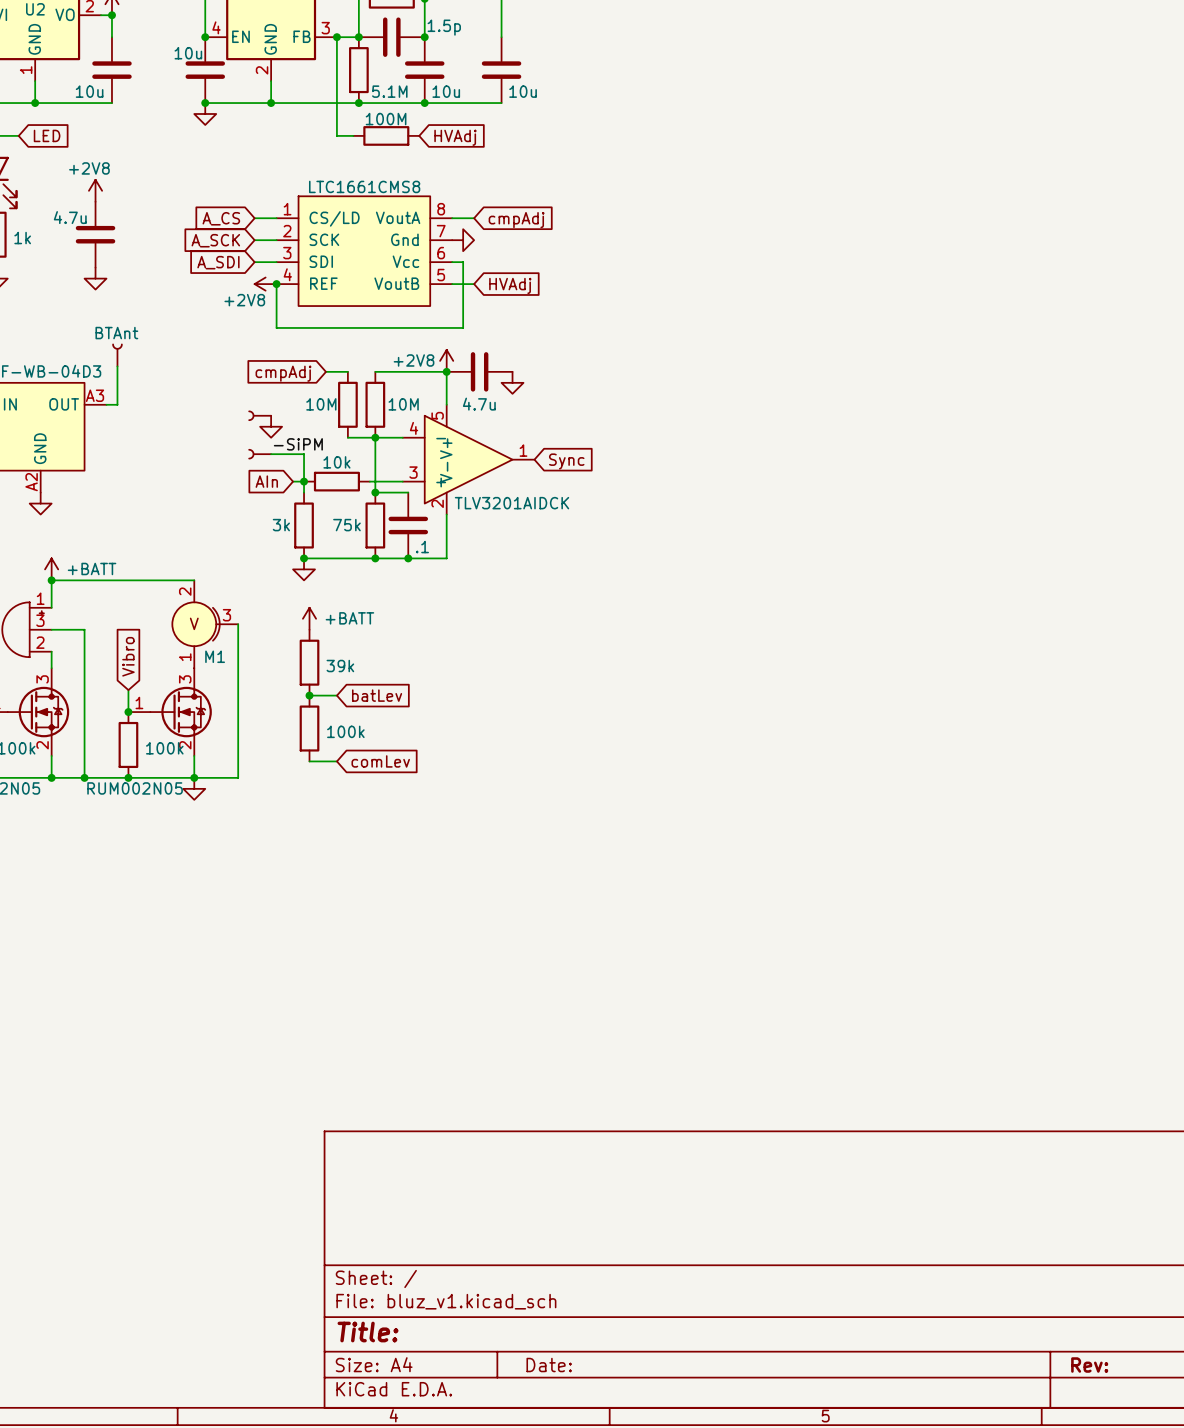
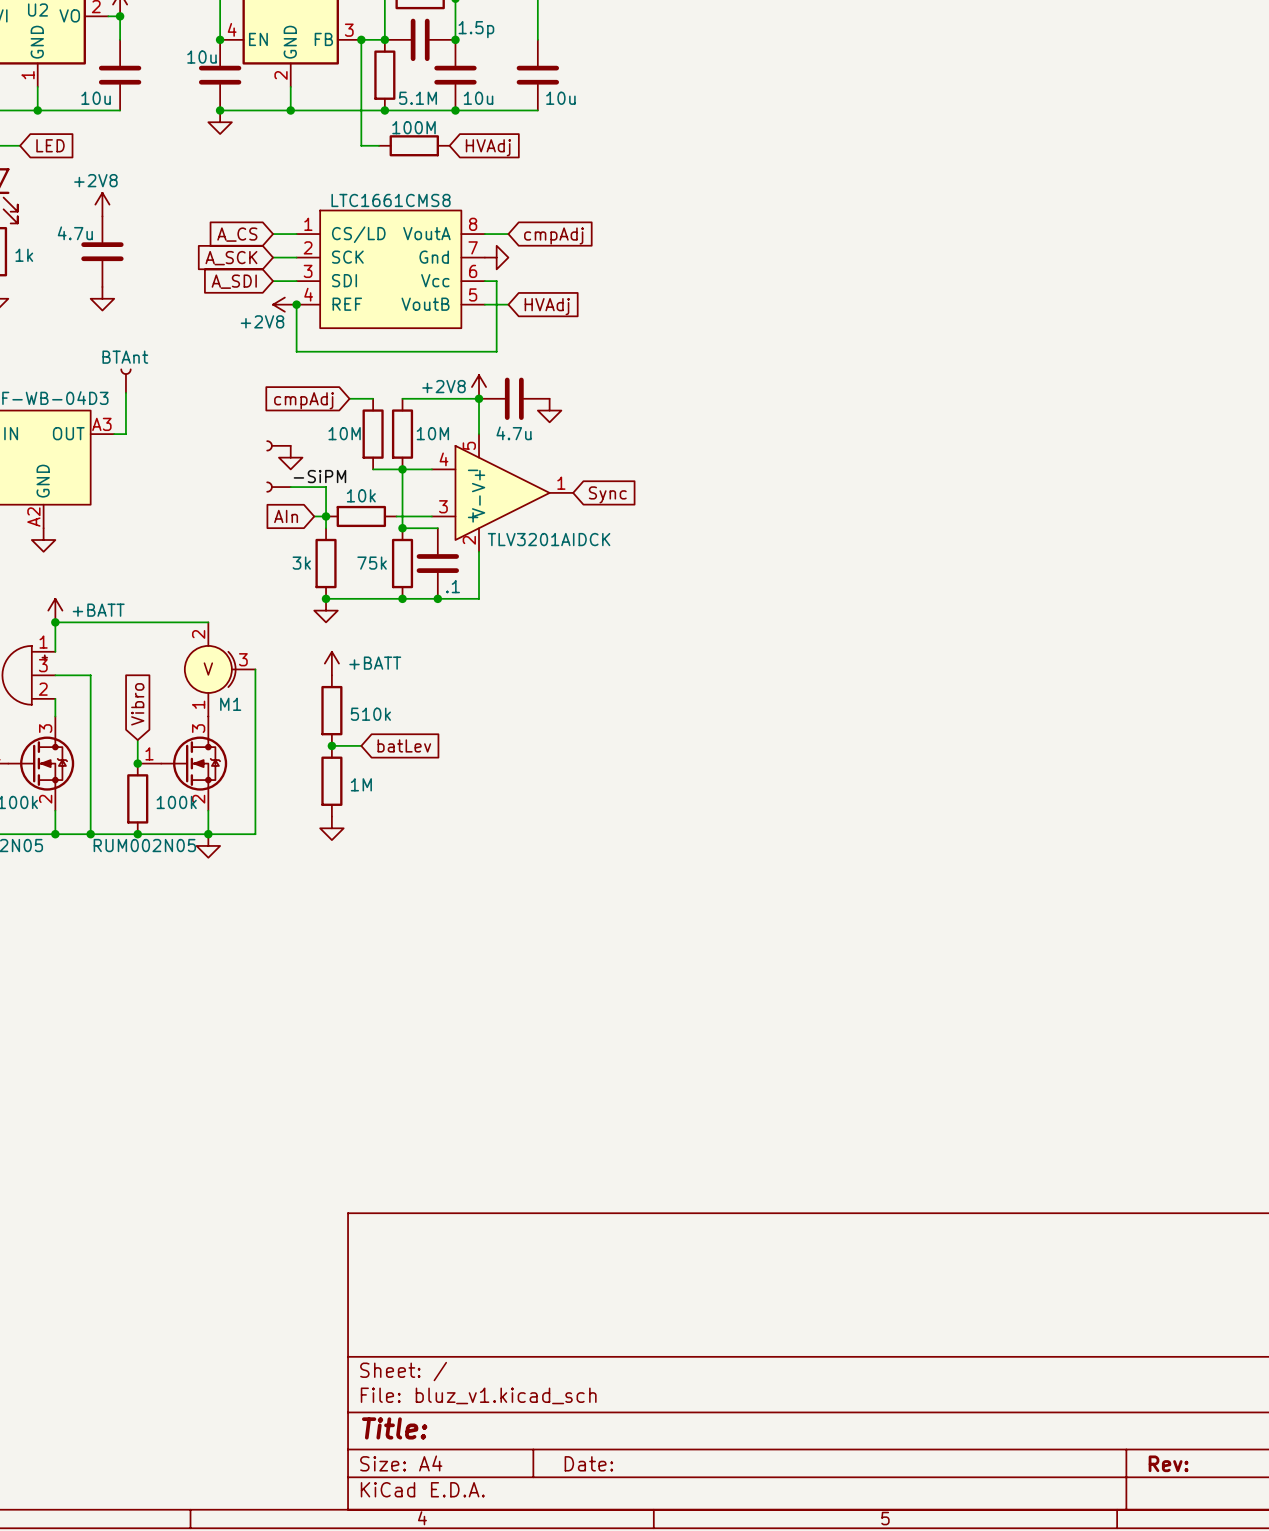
part value: 39k (340, 666) -> 510k (370, 714)
part value: 100k (345, 731) -> 1M (361, 784)
wire: (309, 761) (336, 761) -> none
global label: comLev (380, 761) -> none
power symbol: none -> (331, 828)

